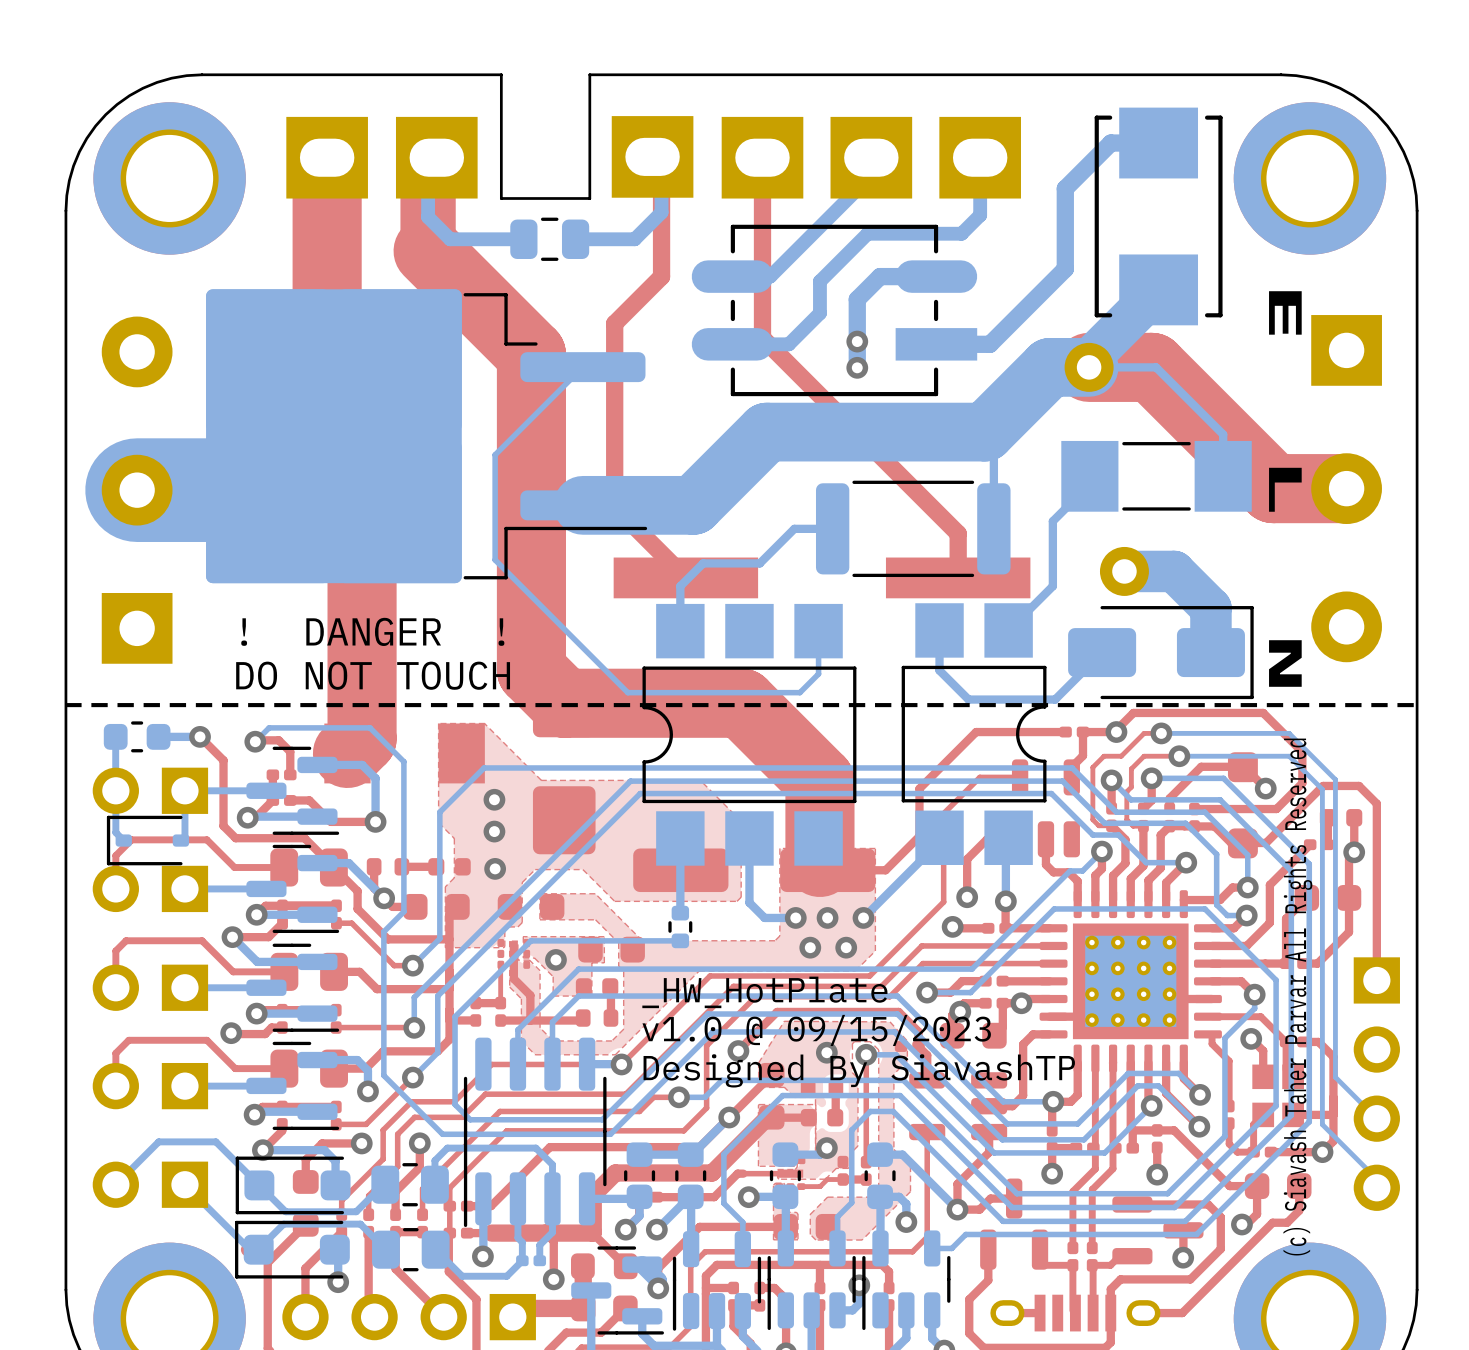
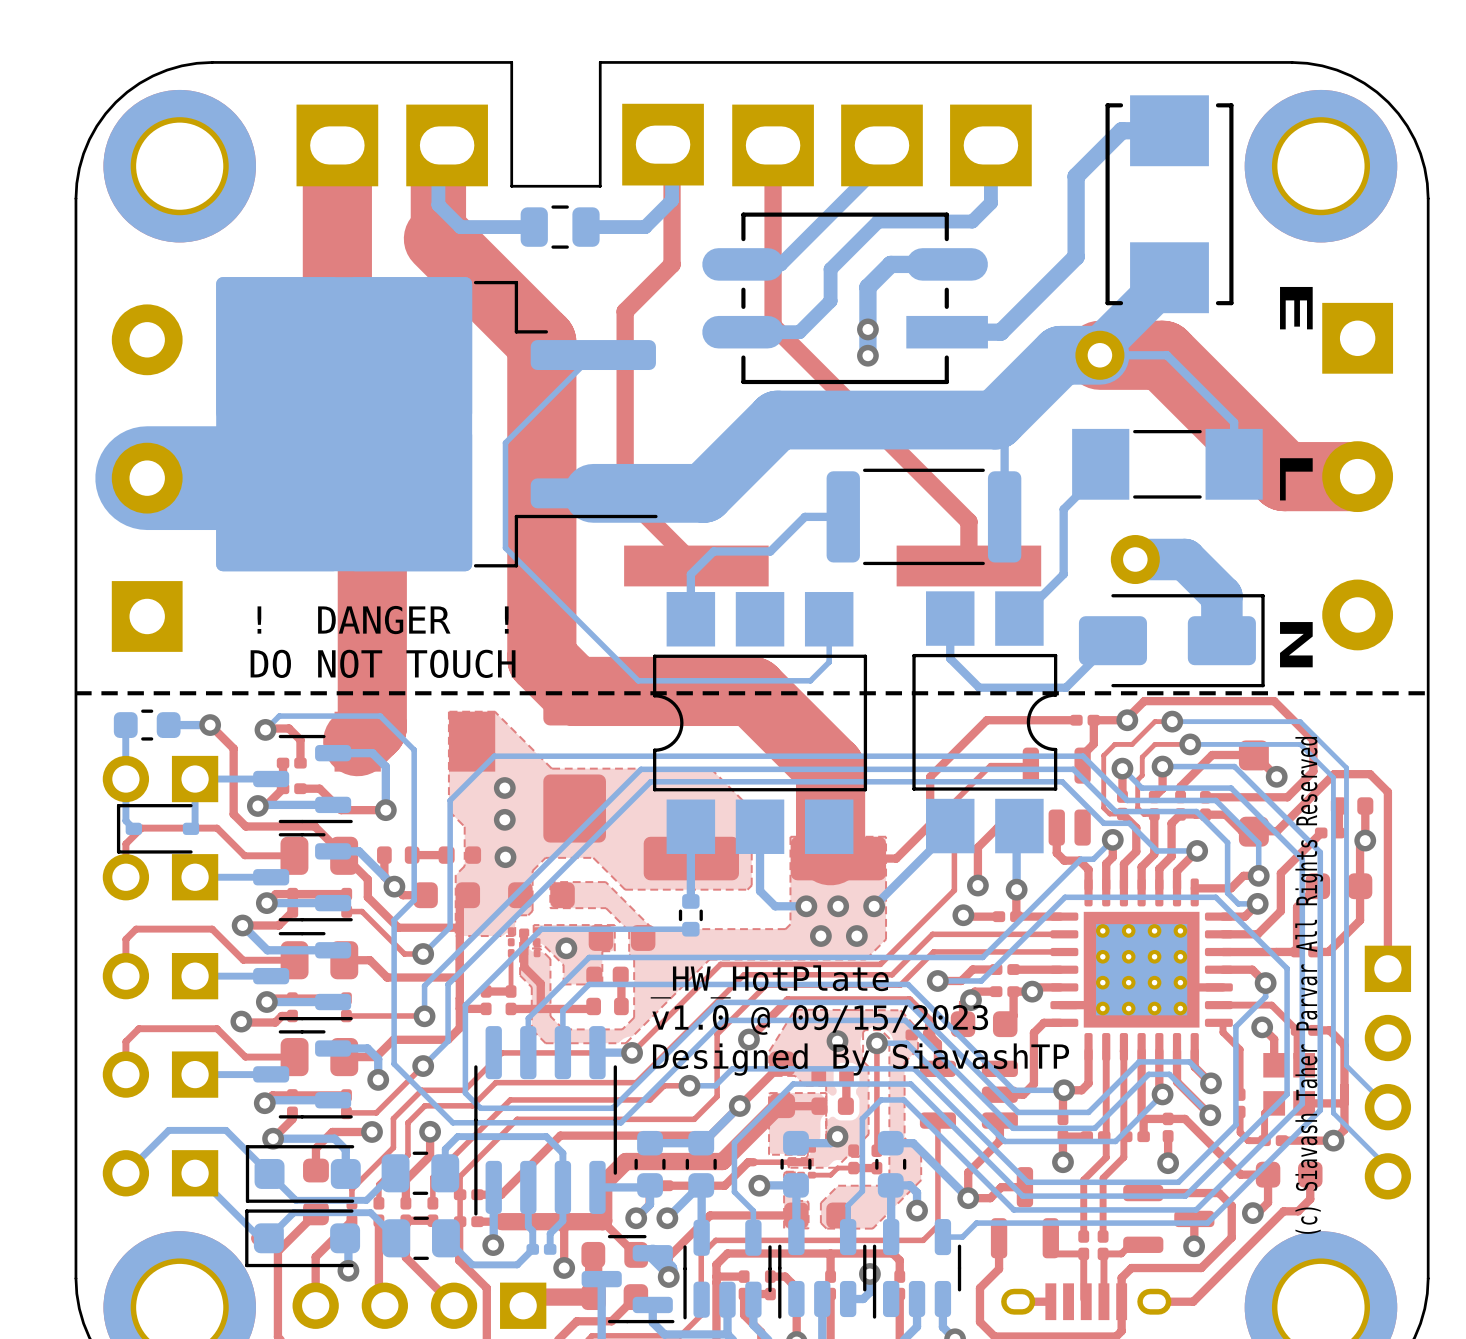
part footprint: [246, 746, 340, 835] -> [253, 734, 353, 824]
part footprint: [246, 844, 340, 934] -> [253, 833, 353, 922]
part footprint: [246, 943, 340, 1032] -> [253, 932, 353, 1021]
part footprint: [246, 1041, 340, 1130] -> [253, 1030, 353, 1119]

